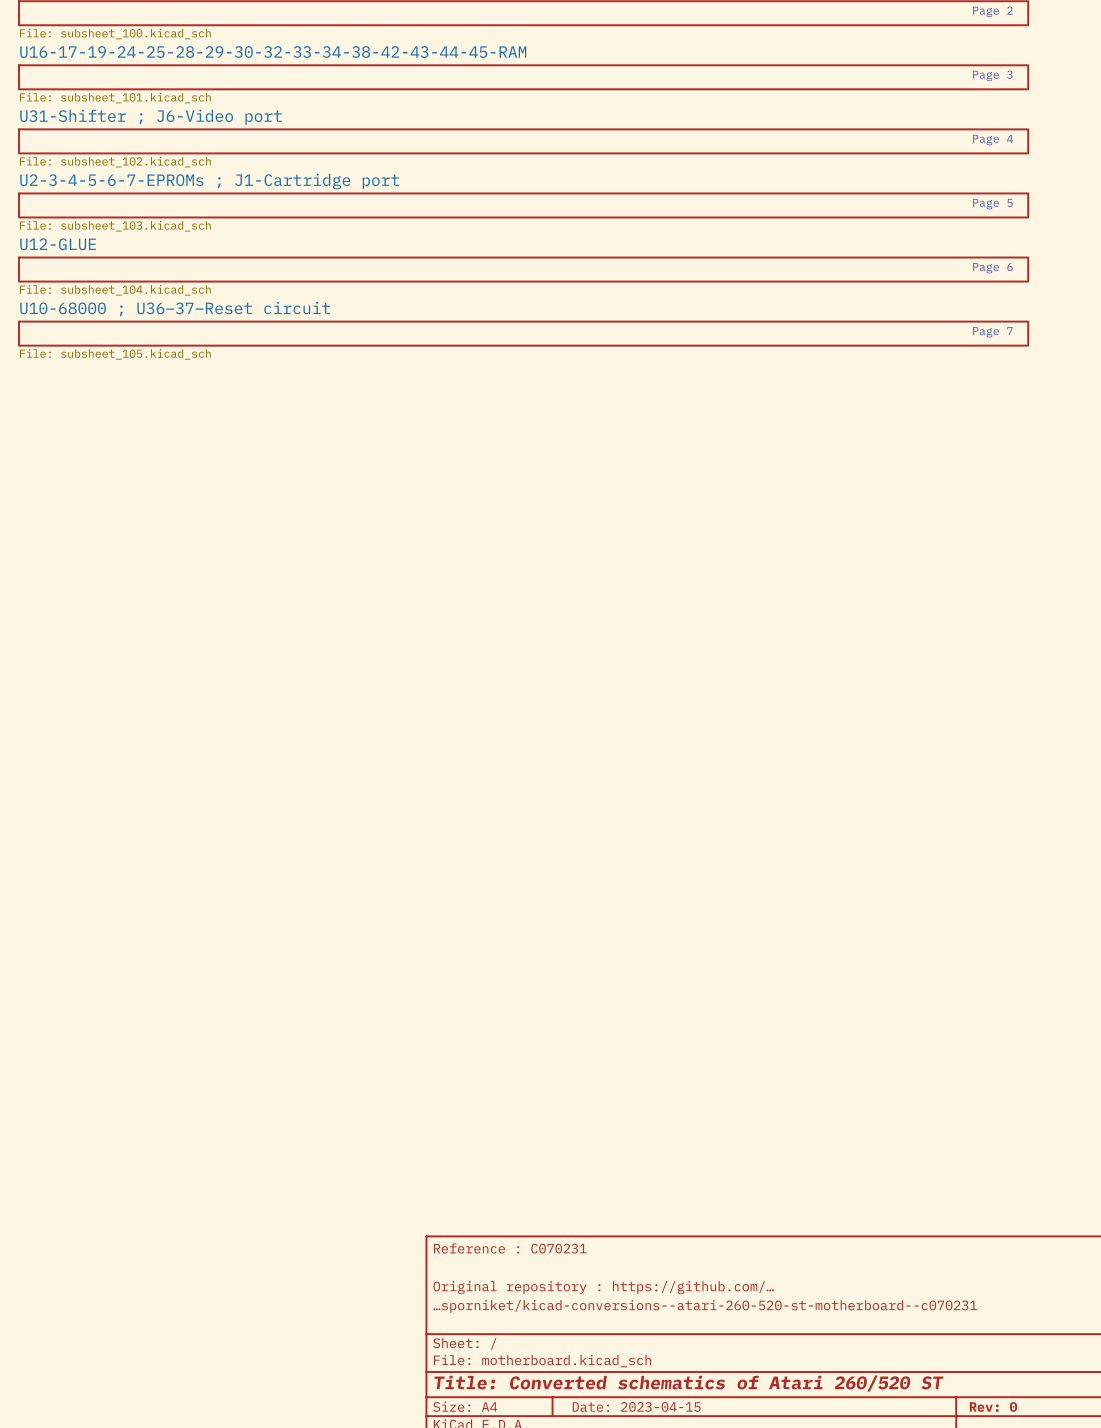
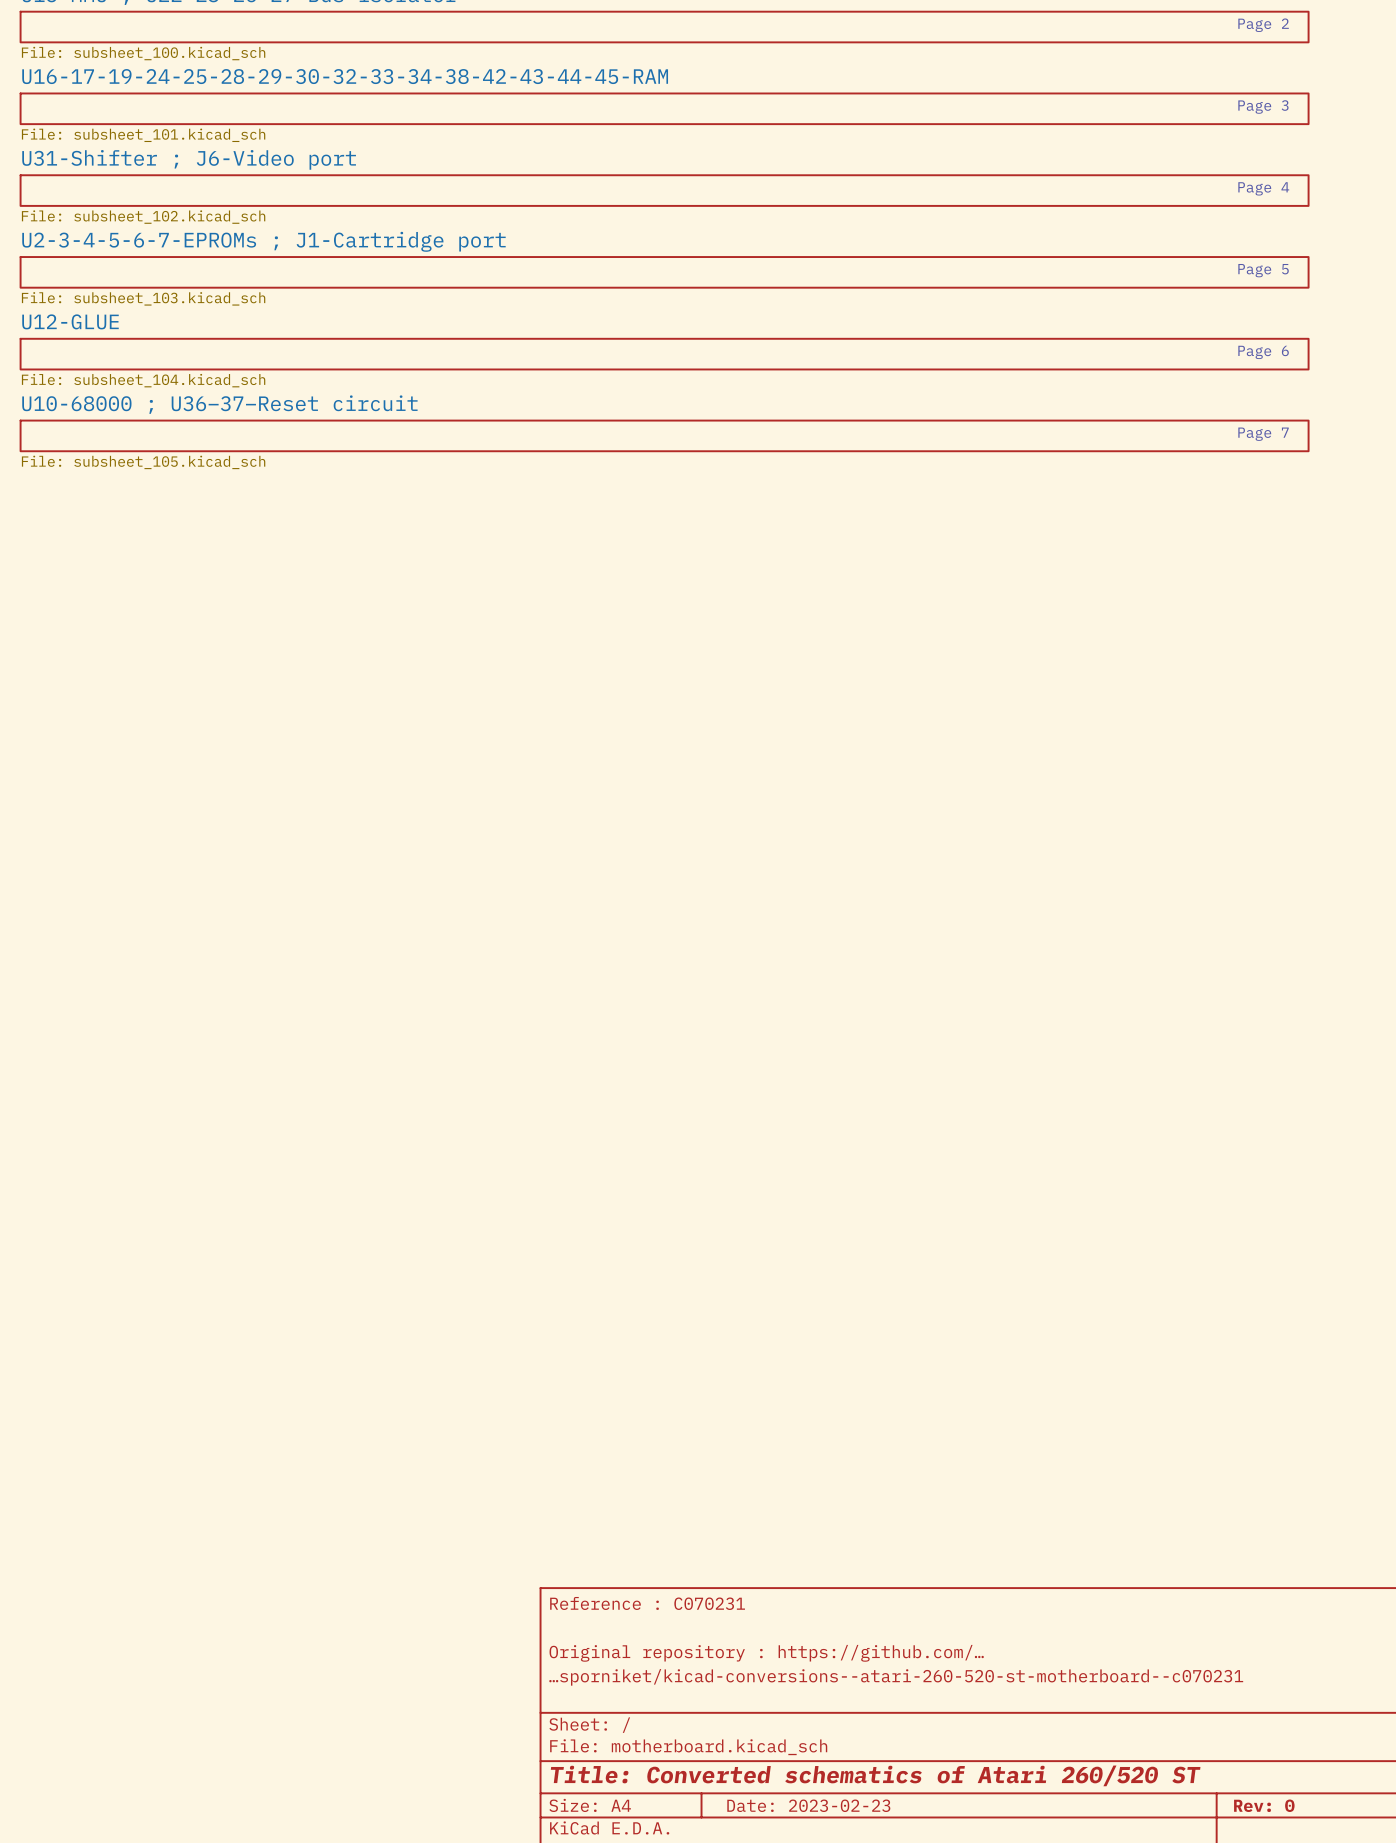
title block: Date: 2023-04-15 (636, 1406) -> Date: 2023-02-23 (808, 1805)

